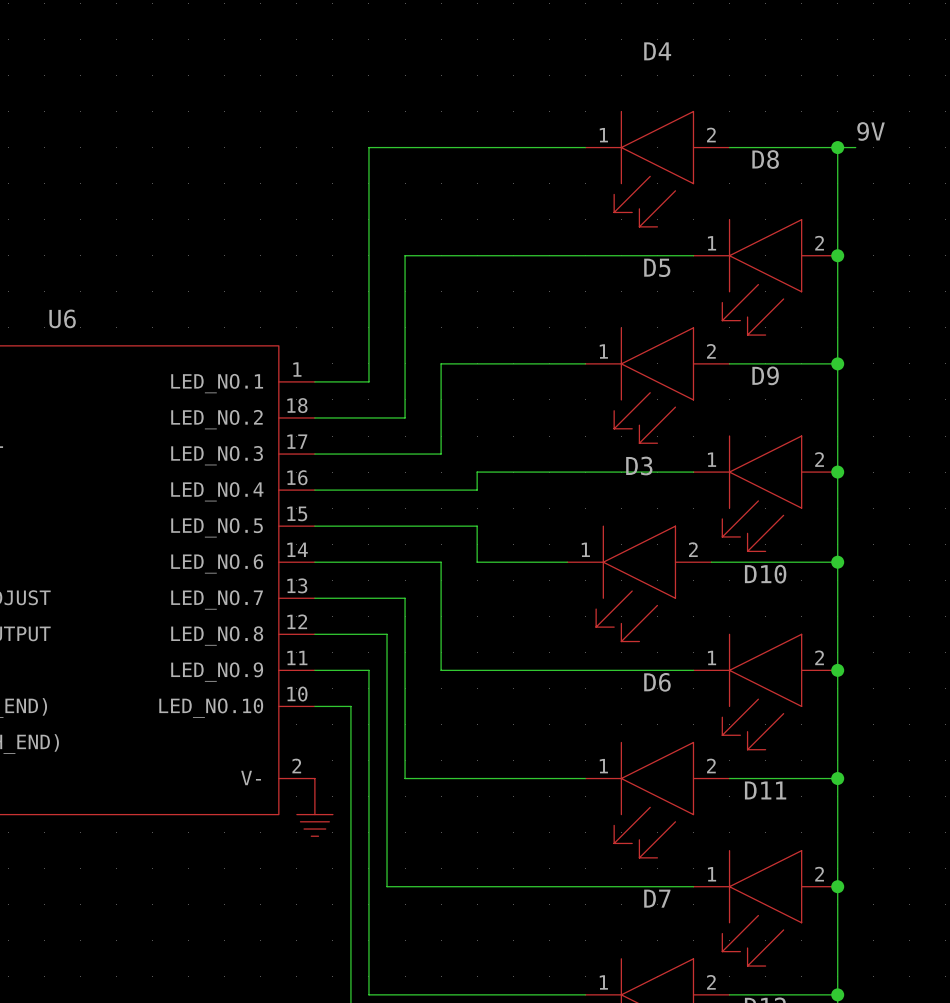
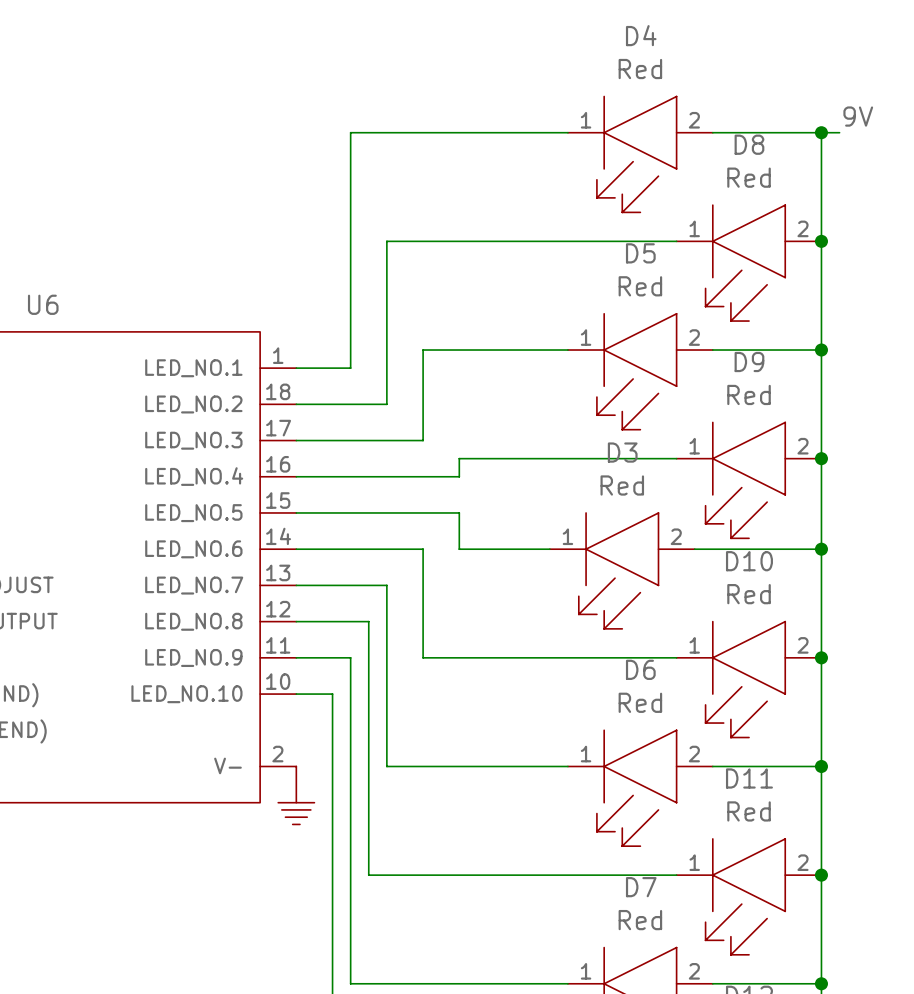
D4 text: none -> Red (640, 69)
D8 text: none -> Red (749, 177)
D5 text: none -> Red (640, 286)
D9 text: none -> Red (749, 394)
D3 text: none -> Red (622, 485)
D10 text: none -> Red (749, 594)
D6 text: none -> Red (640, 702)
D11 text: none -> Red (749, 811)
D7 text: none -> Red (640, 920)

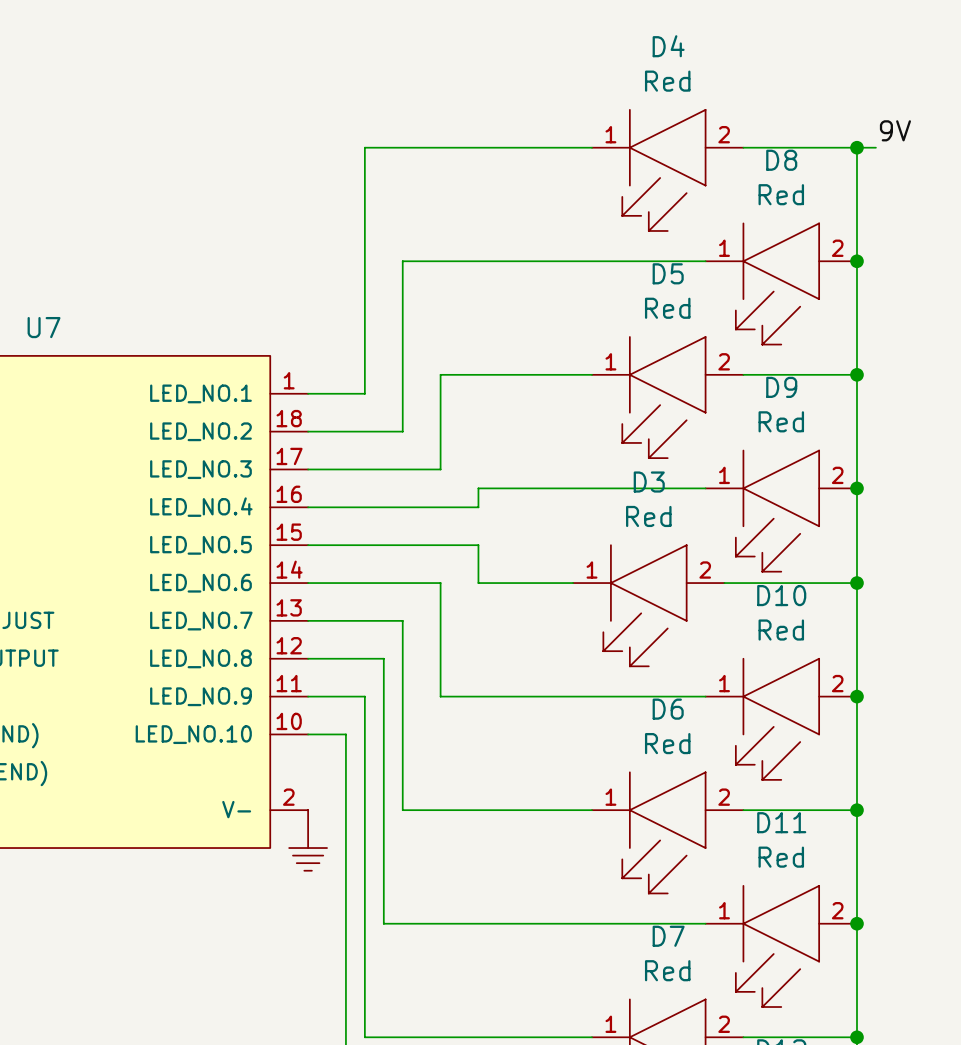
U6 name: U6 (43, 304) -> U7 (44, 327)

